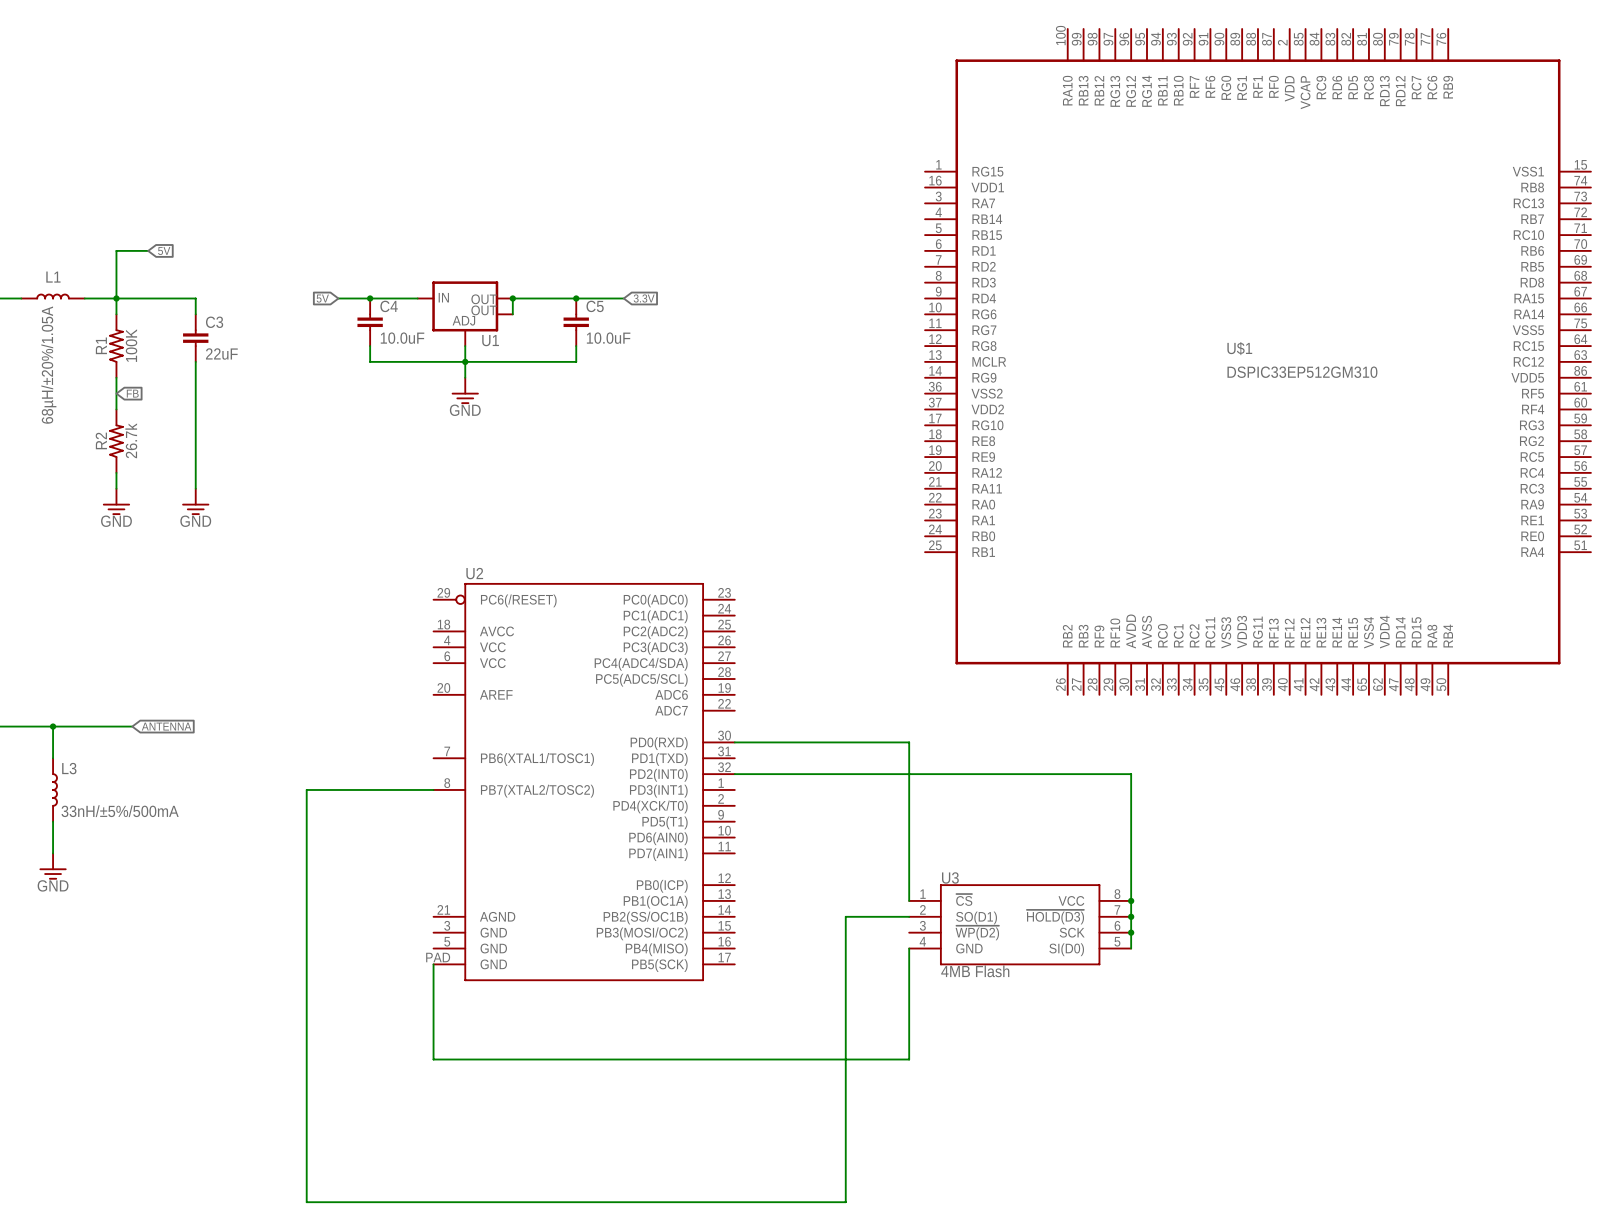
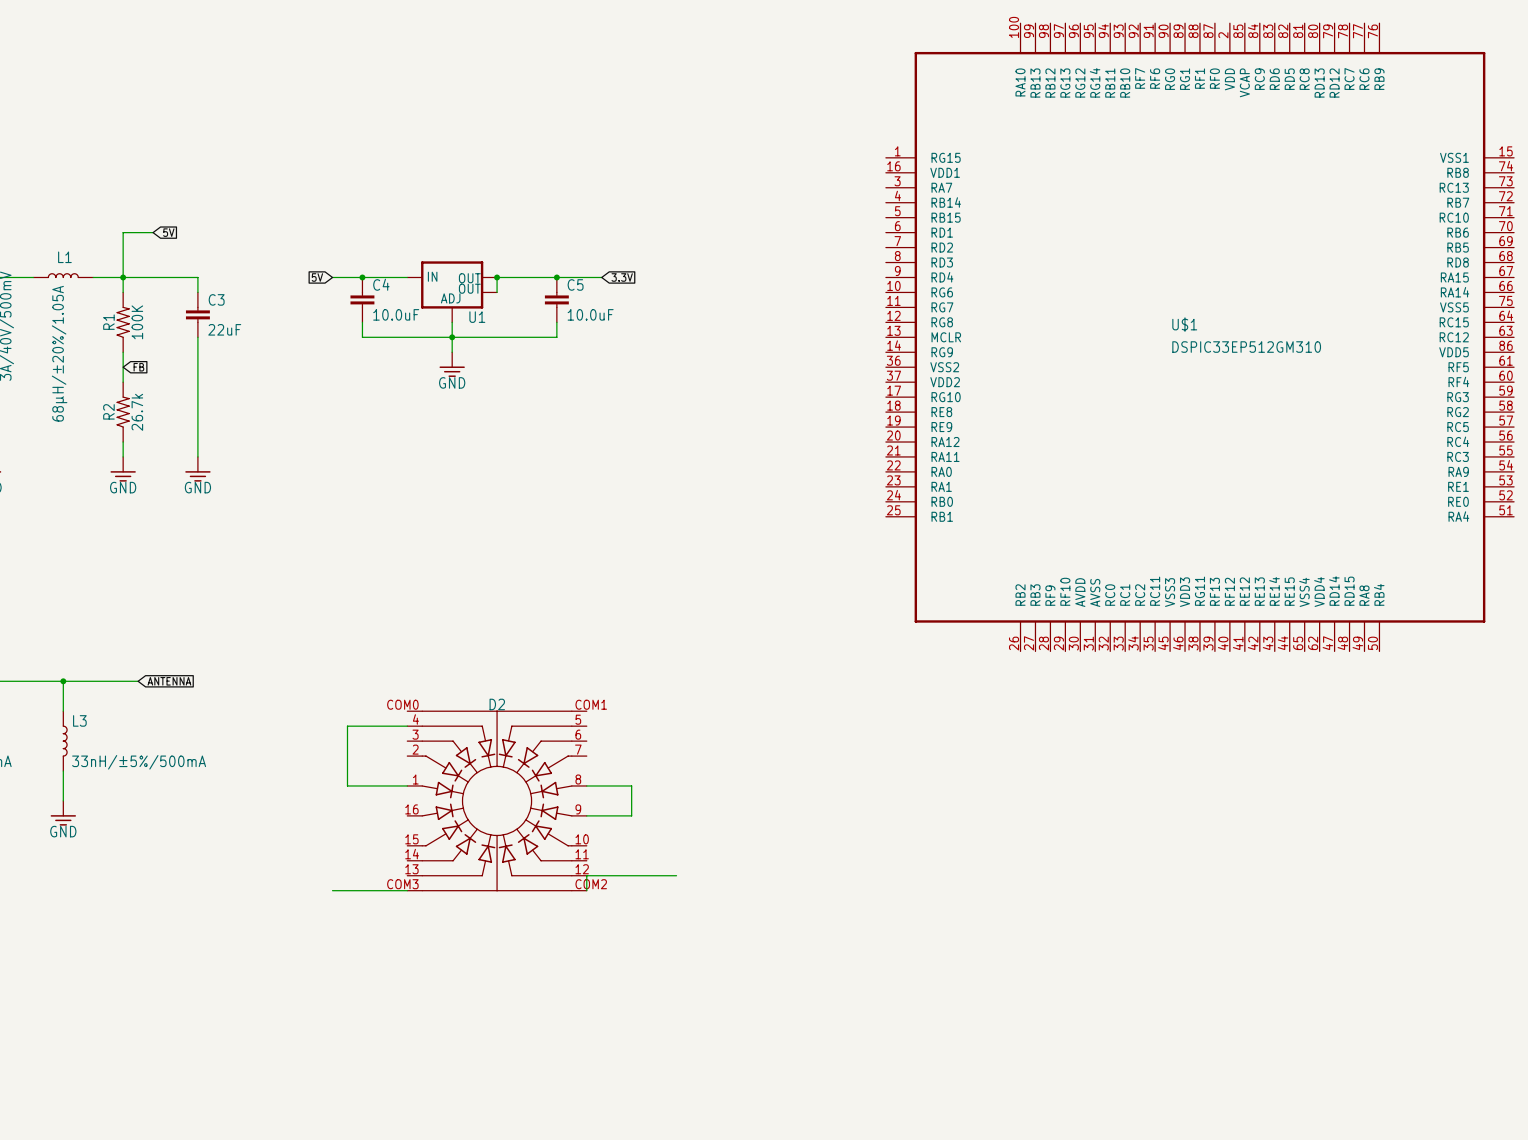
wire: (734, 742) (909, 742) (909, 900) -> none
wire: none -> (407, 726) (347, 726) (347, 785) (407, 785)
wire: (734, 774) (1131, 774) (1131, 948) -> none
U2: (584, 782) -> none
wire: (433, 789) (306, 789) (306, 1202) (845, 1202) (845, 916) (909, 916) -> none
wire: none -> (586, 785) (631, 785) (631, 815) (586, 815)
D2: none -> (497, 800)
junction: (1131, 900) -> none
junction: (1131, 916) -> none
U3: 4MB Flash (1020, 924) -> none
wire: none -> (676, 875) (586, 875) (586, 890)
junction: (1131, 932) -> none
wire: none -> (332, 890) (407, 890)
wire: (909, 948) (909, 1059) (433, 1059) (433, 964) -> none

